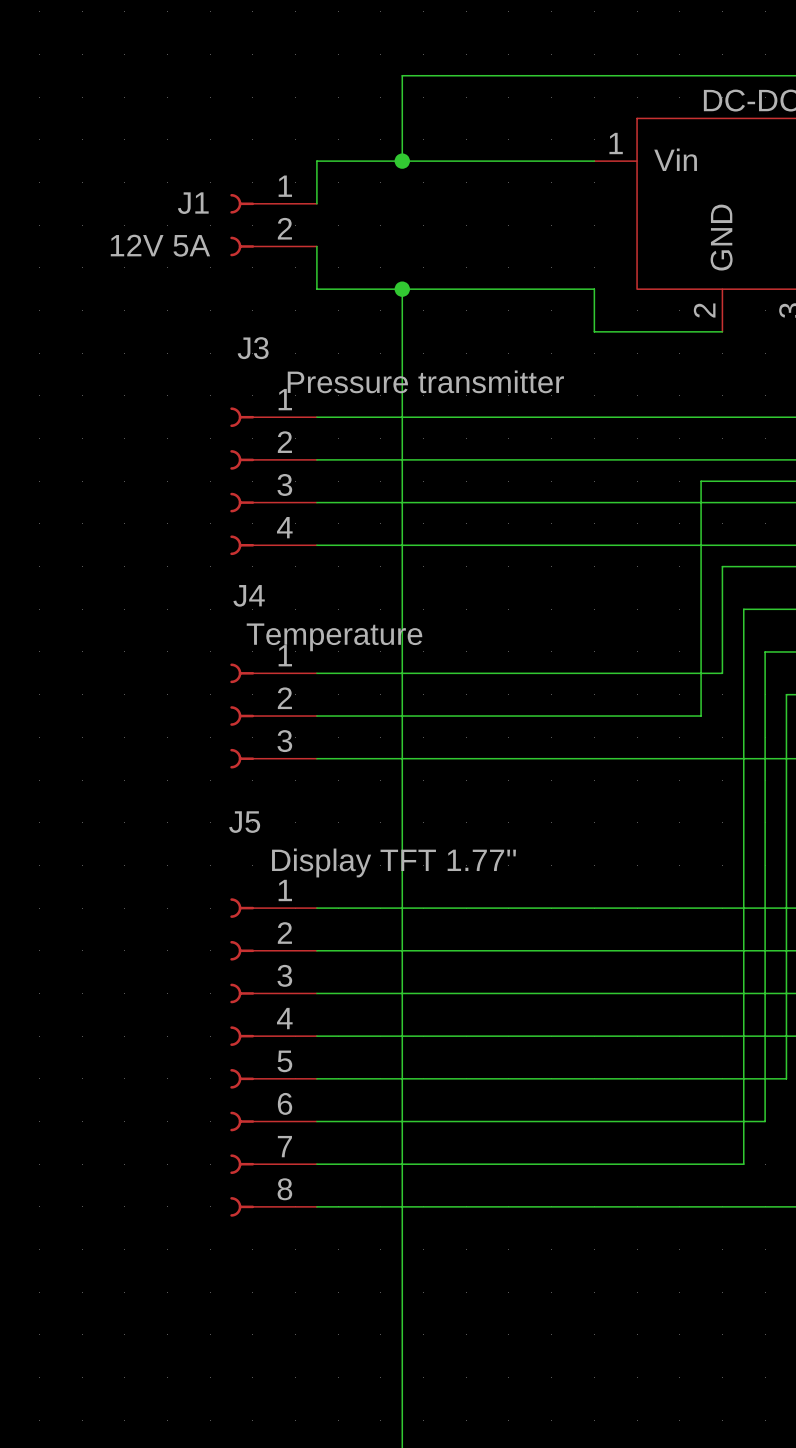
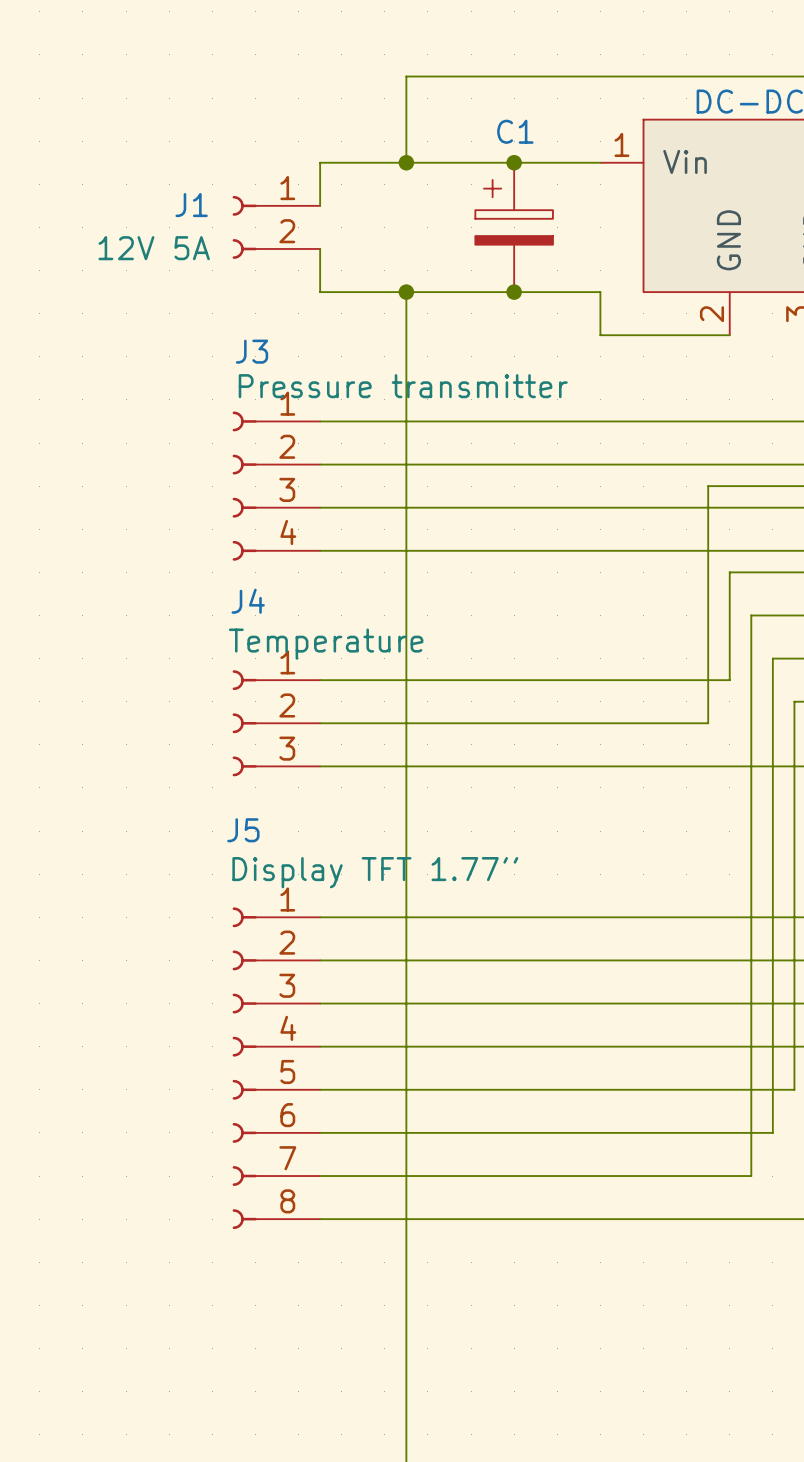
junction: none -> (514, 162)
C1: none -> (514, 227)
junction: none -> (514, 292)

